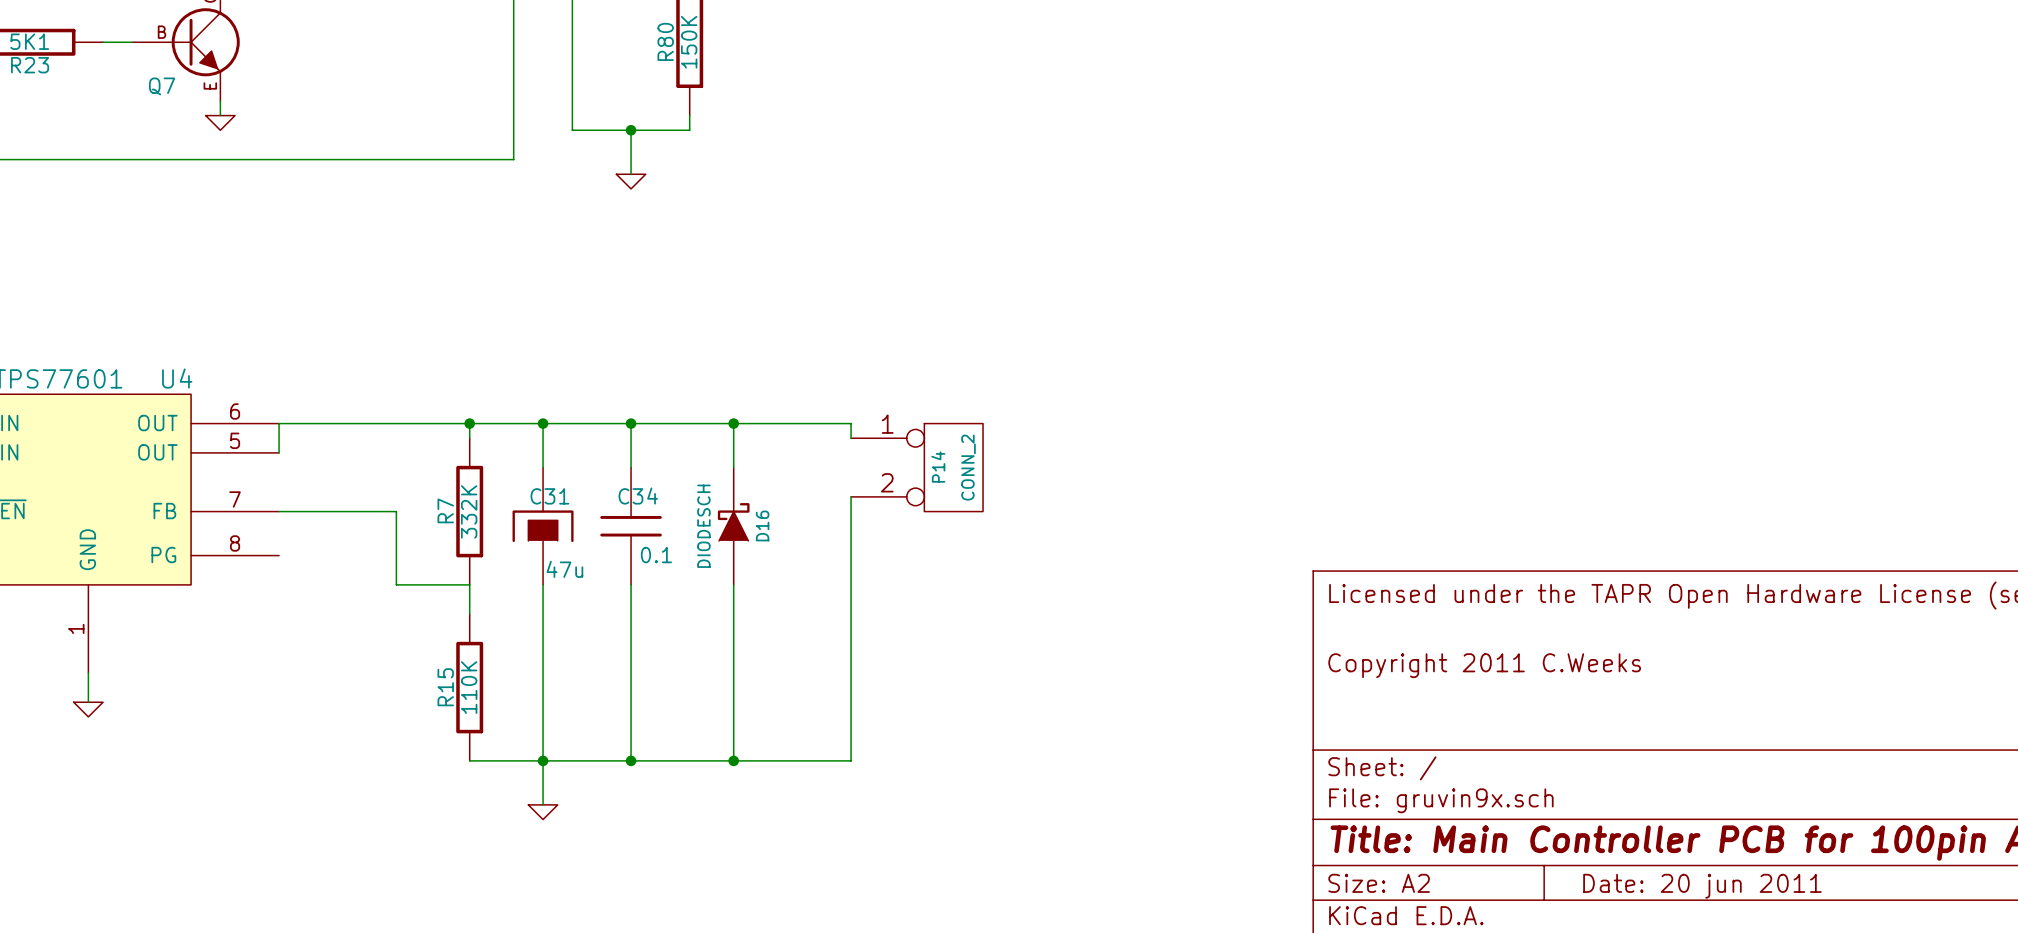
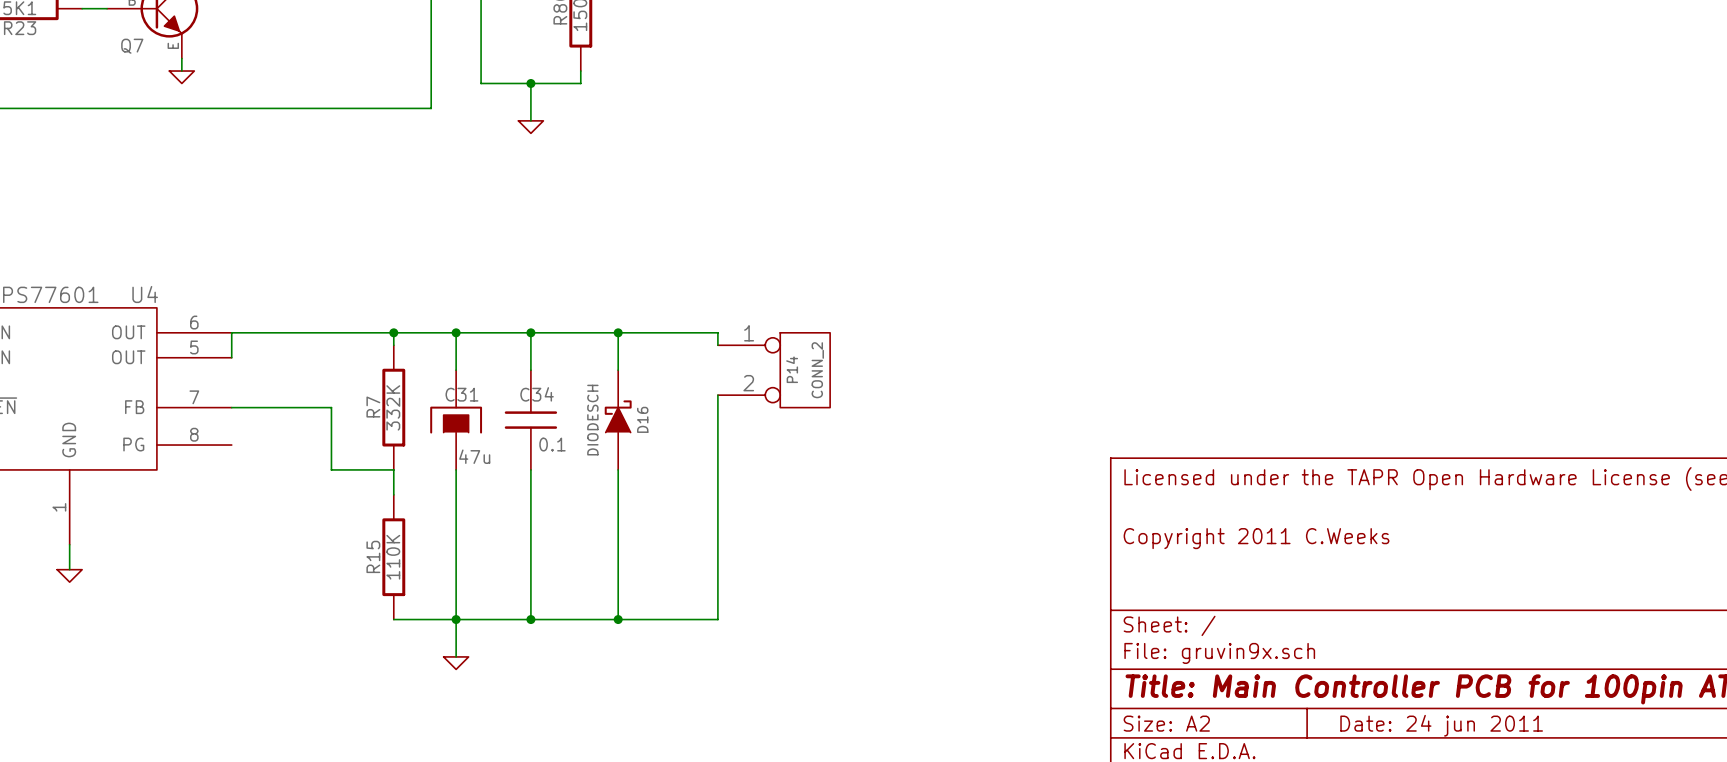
title block: Date: 20 jun 2011 (1702, 886) -> Date: 24 jun 2011 (1441, 725)

